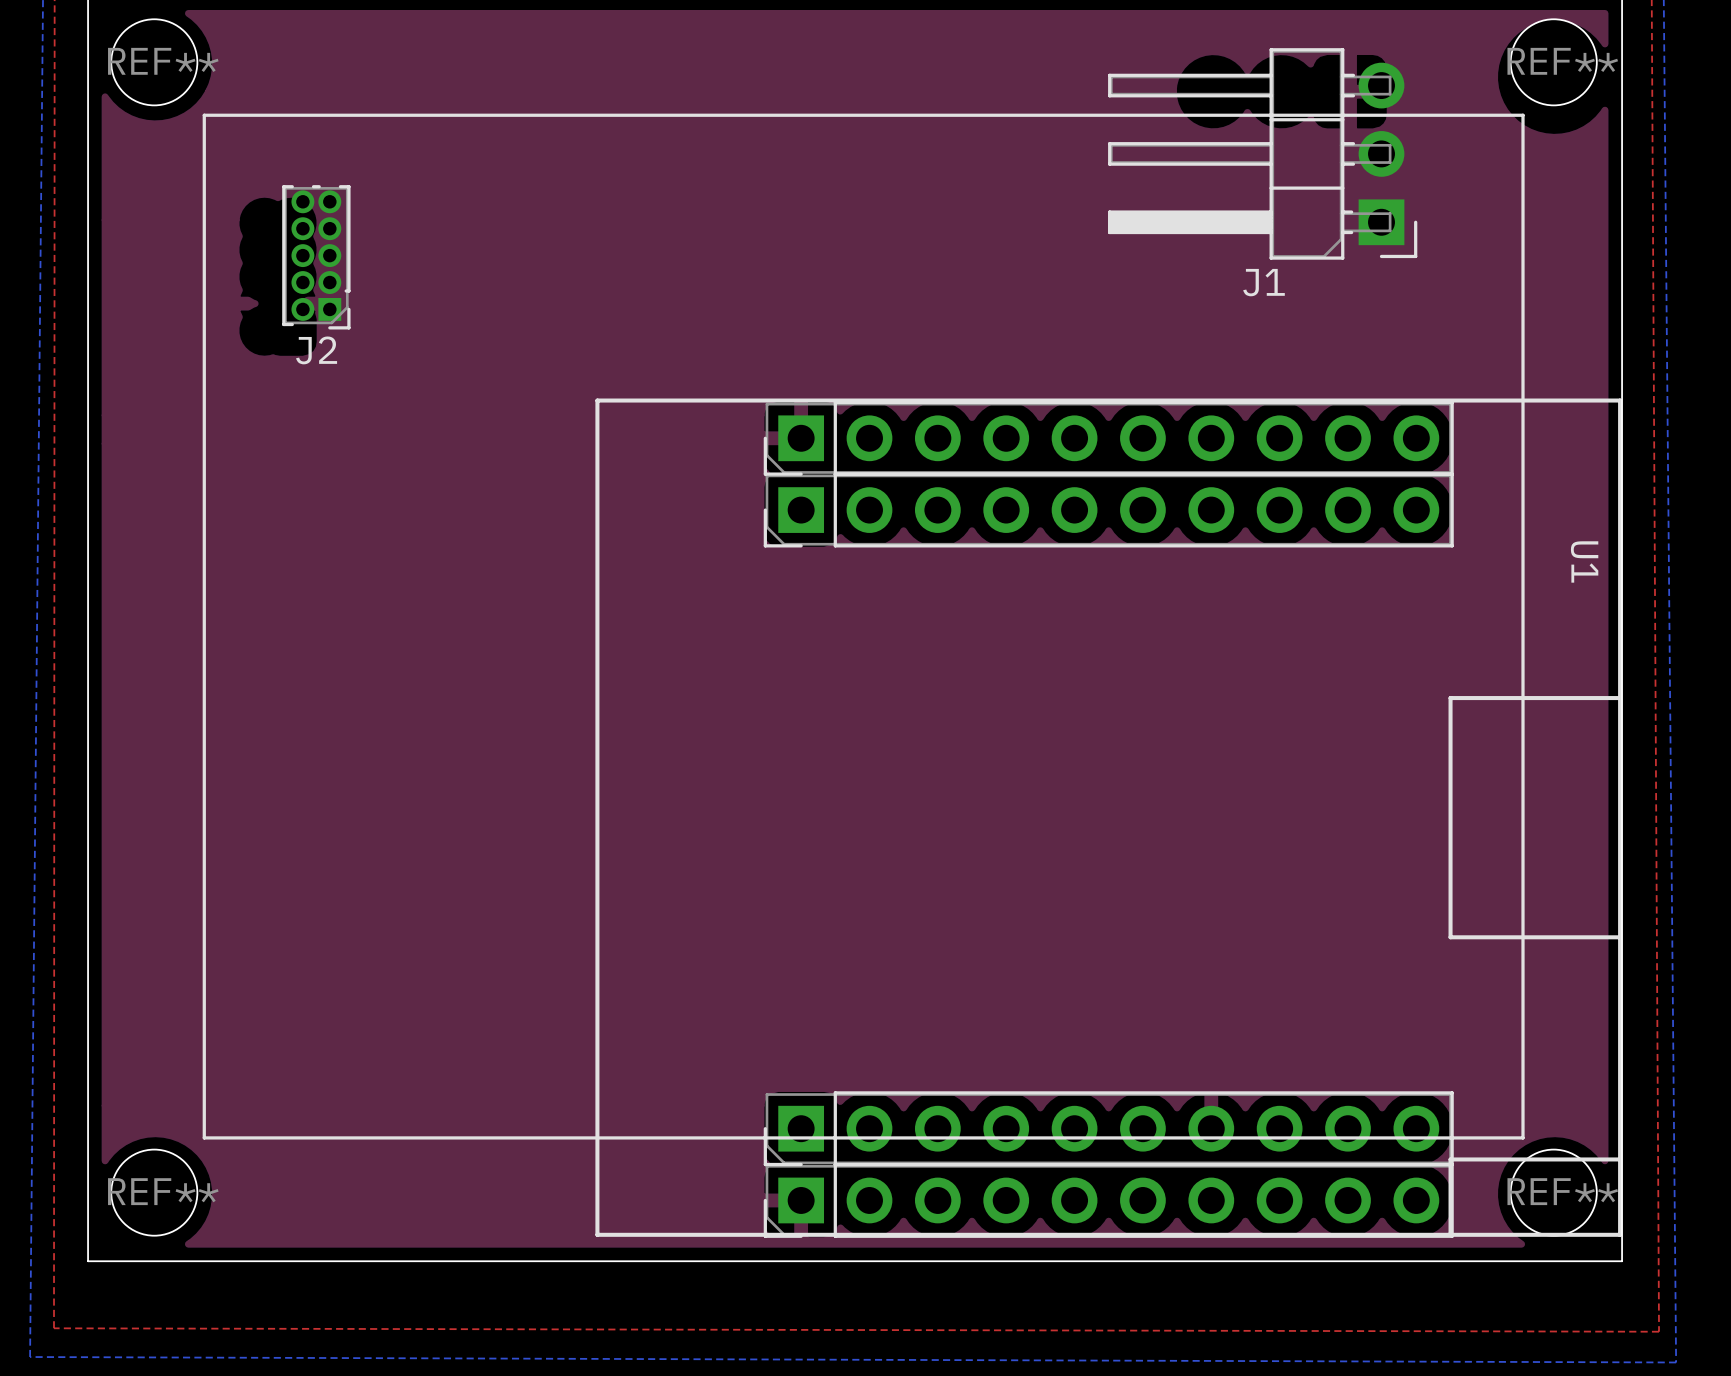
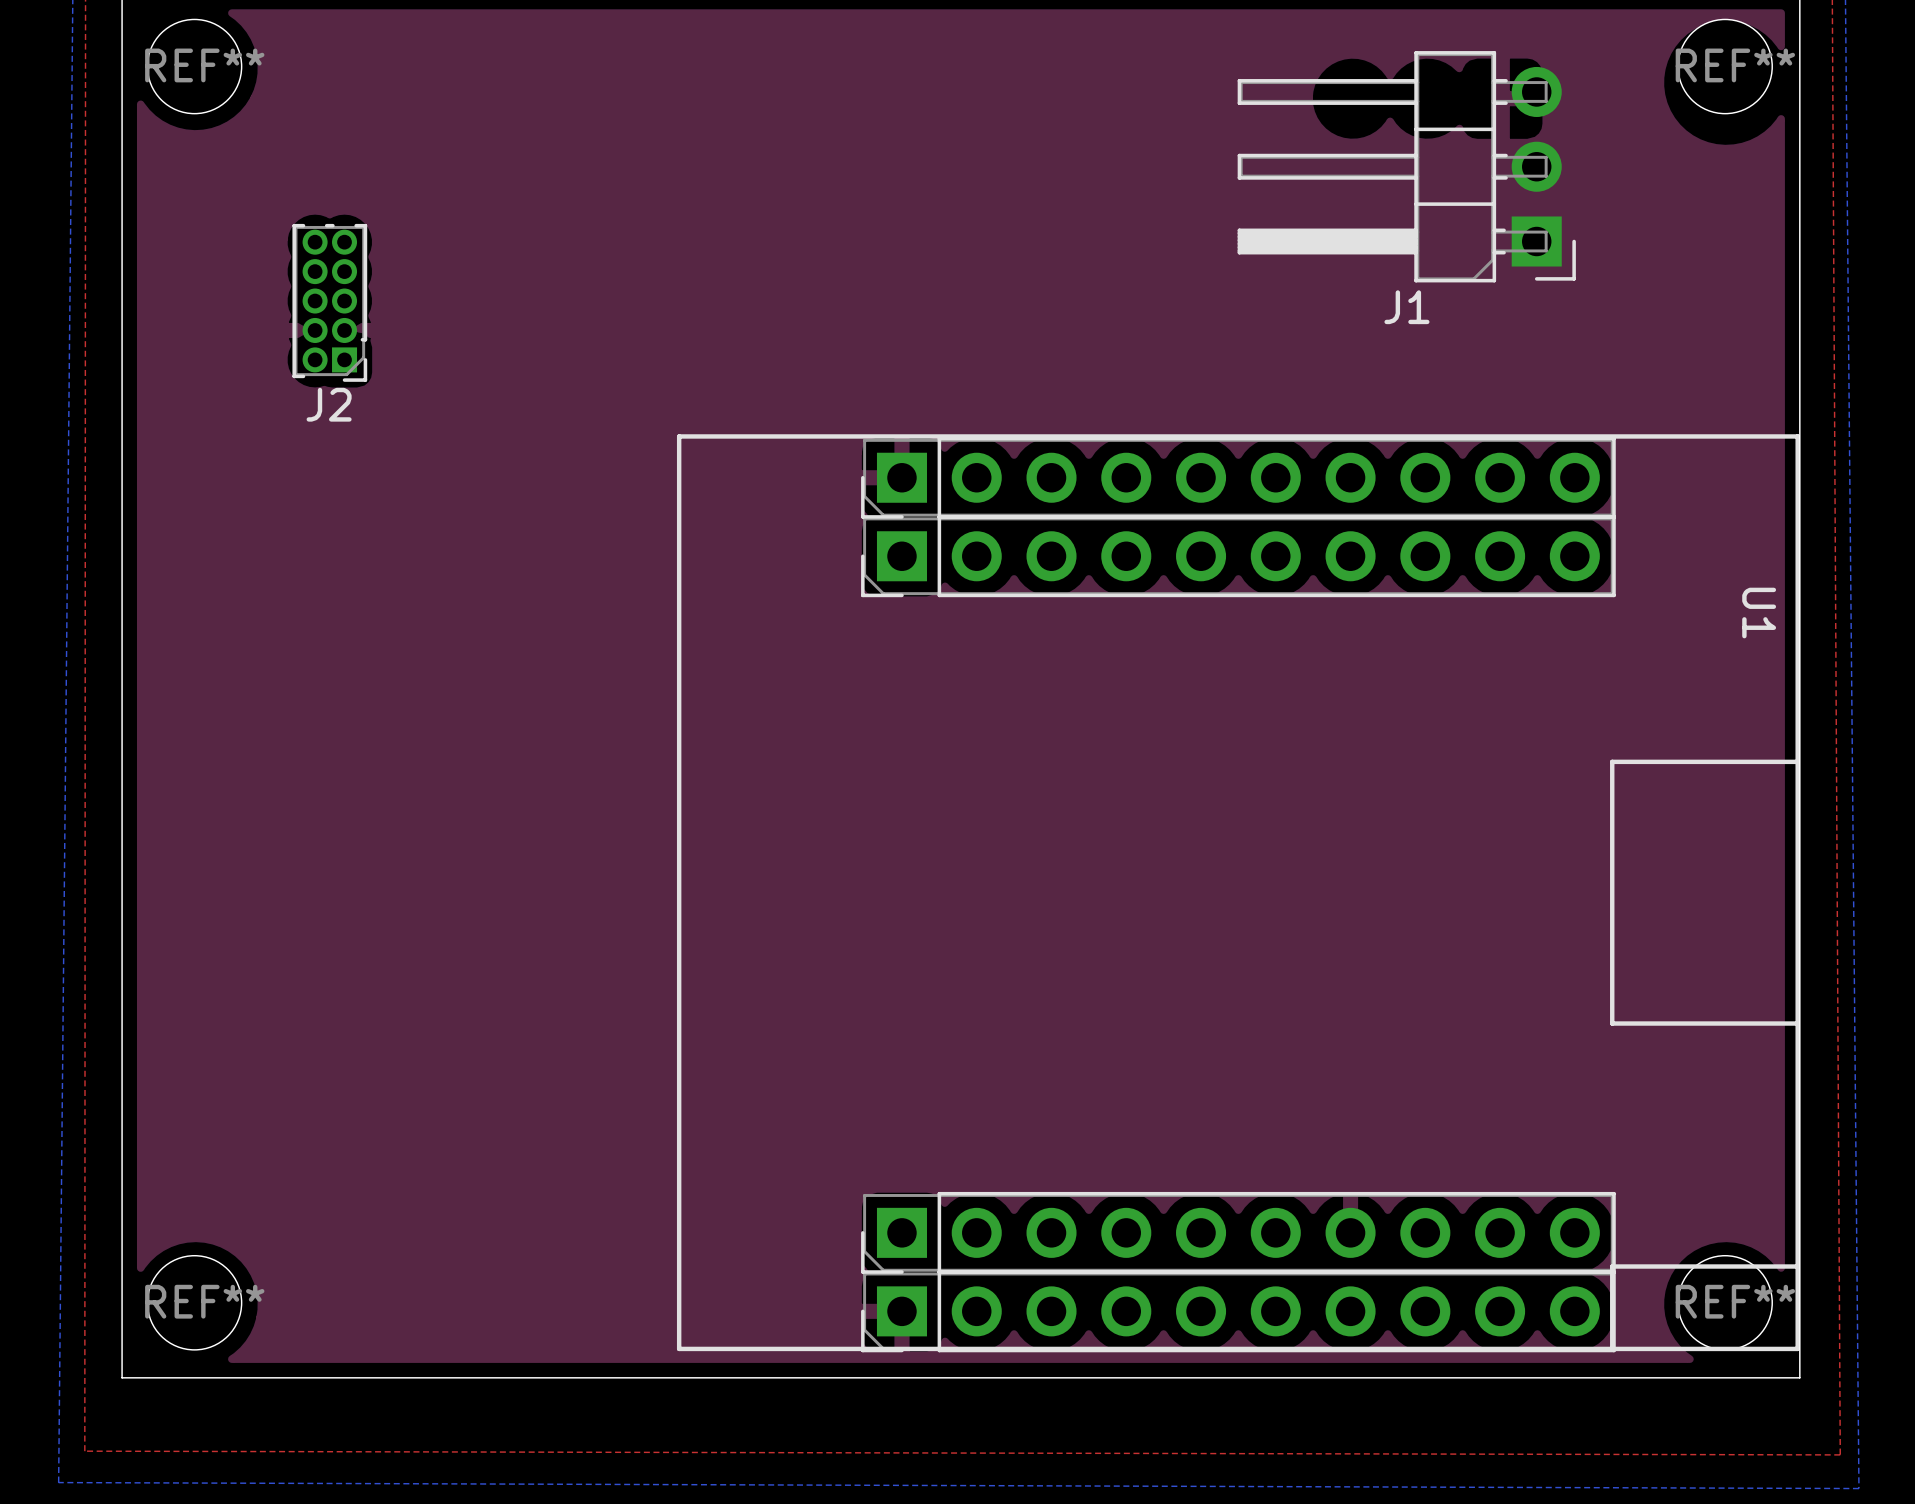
line: (204, 115) (204, 1137) (1523, 1137) (1523, 115) (204, 115) -> none
J2 position: (316, 257) -> (329, 302)

